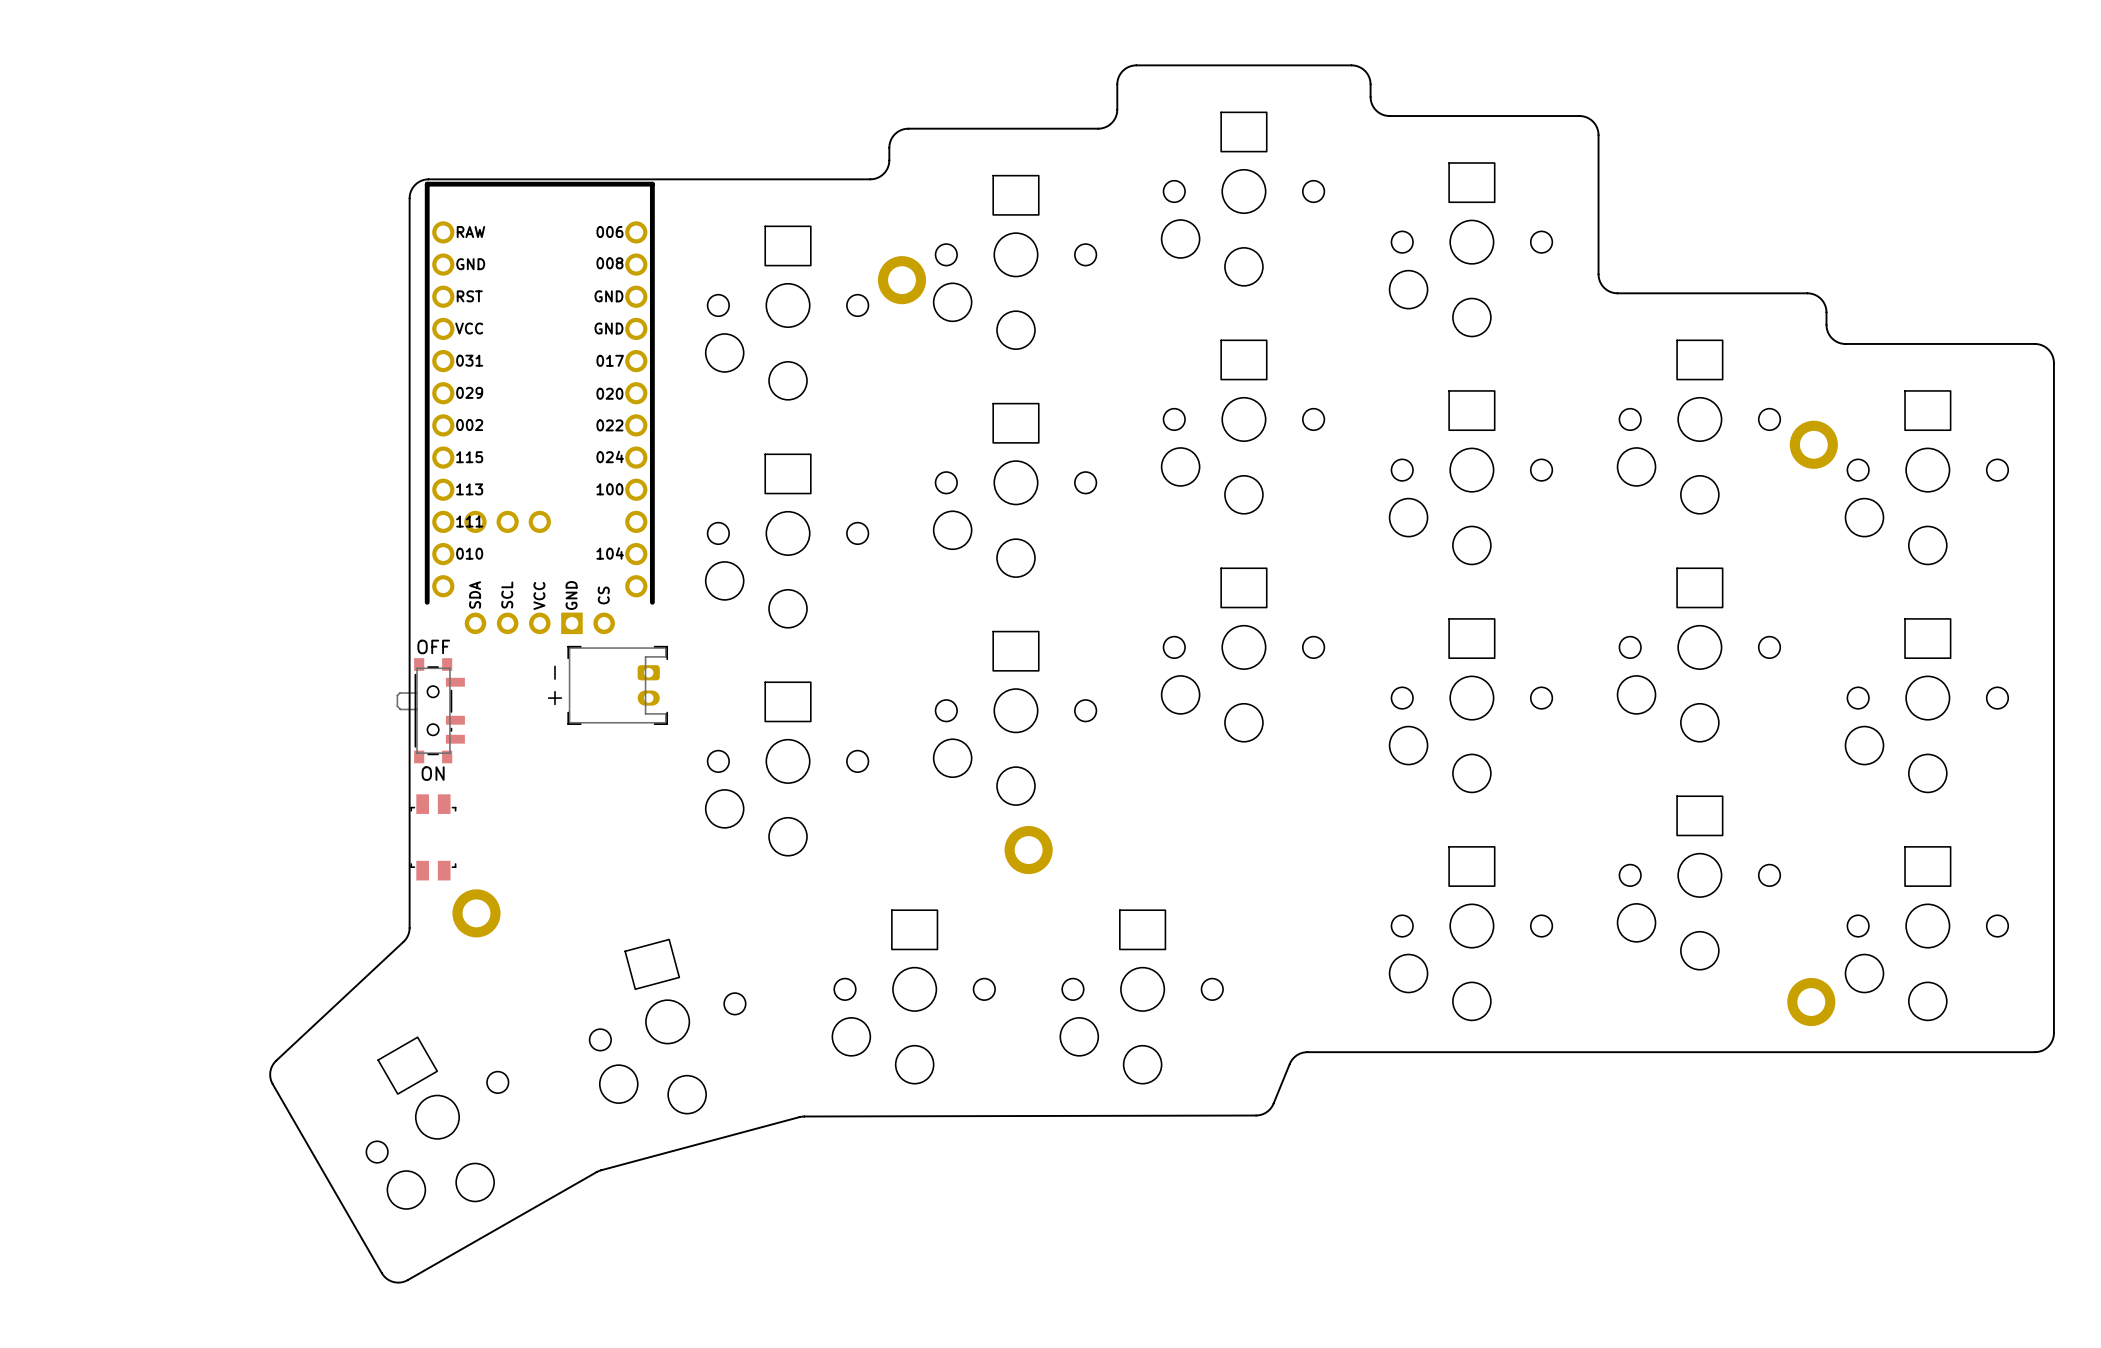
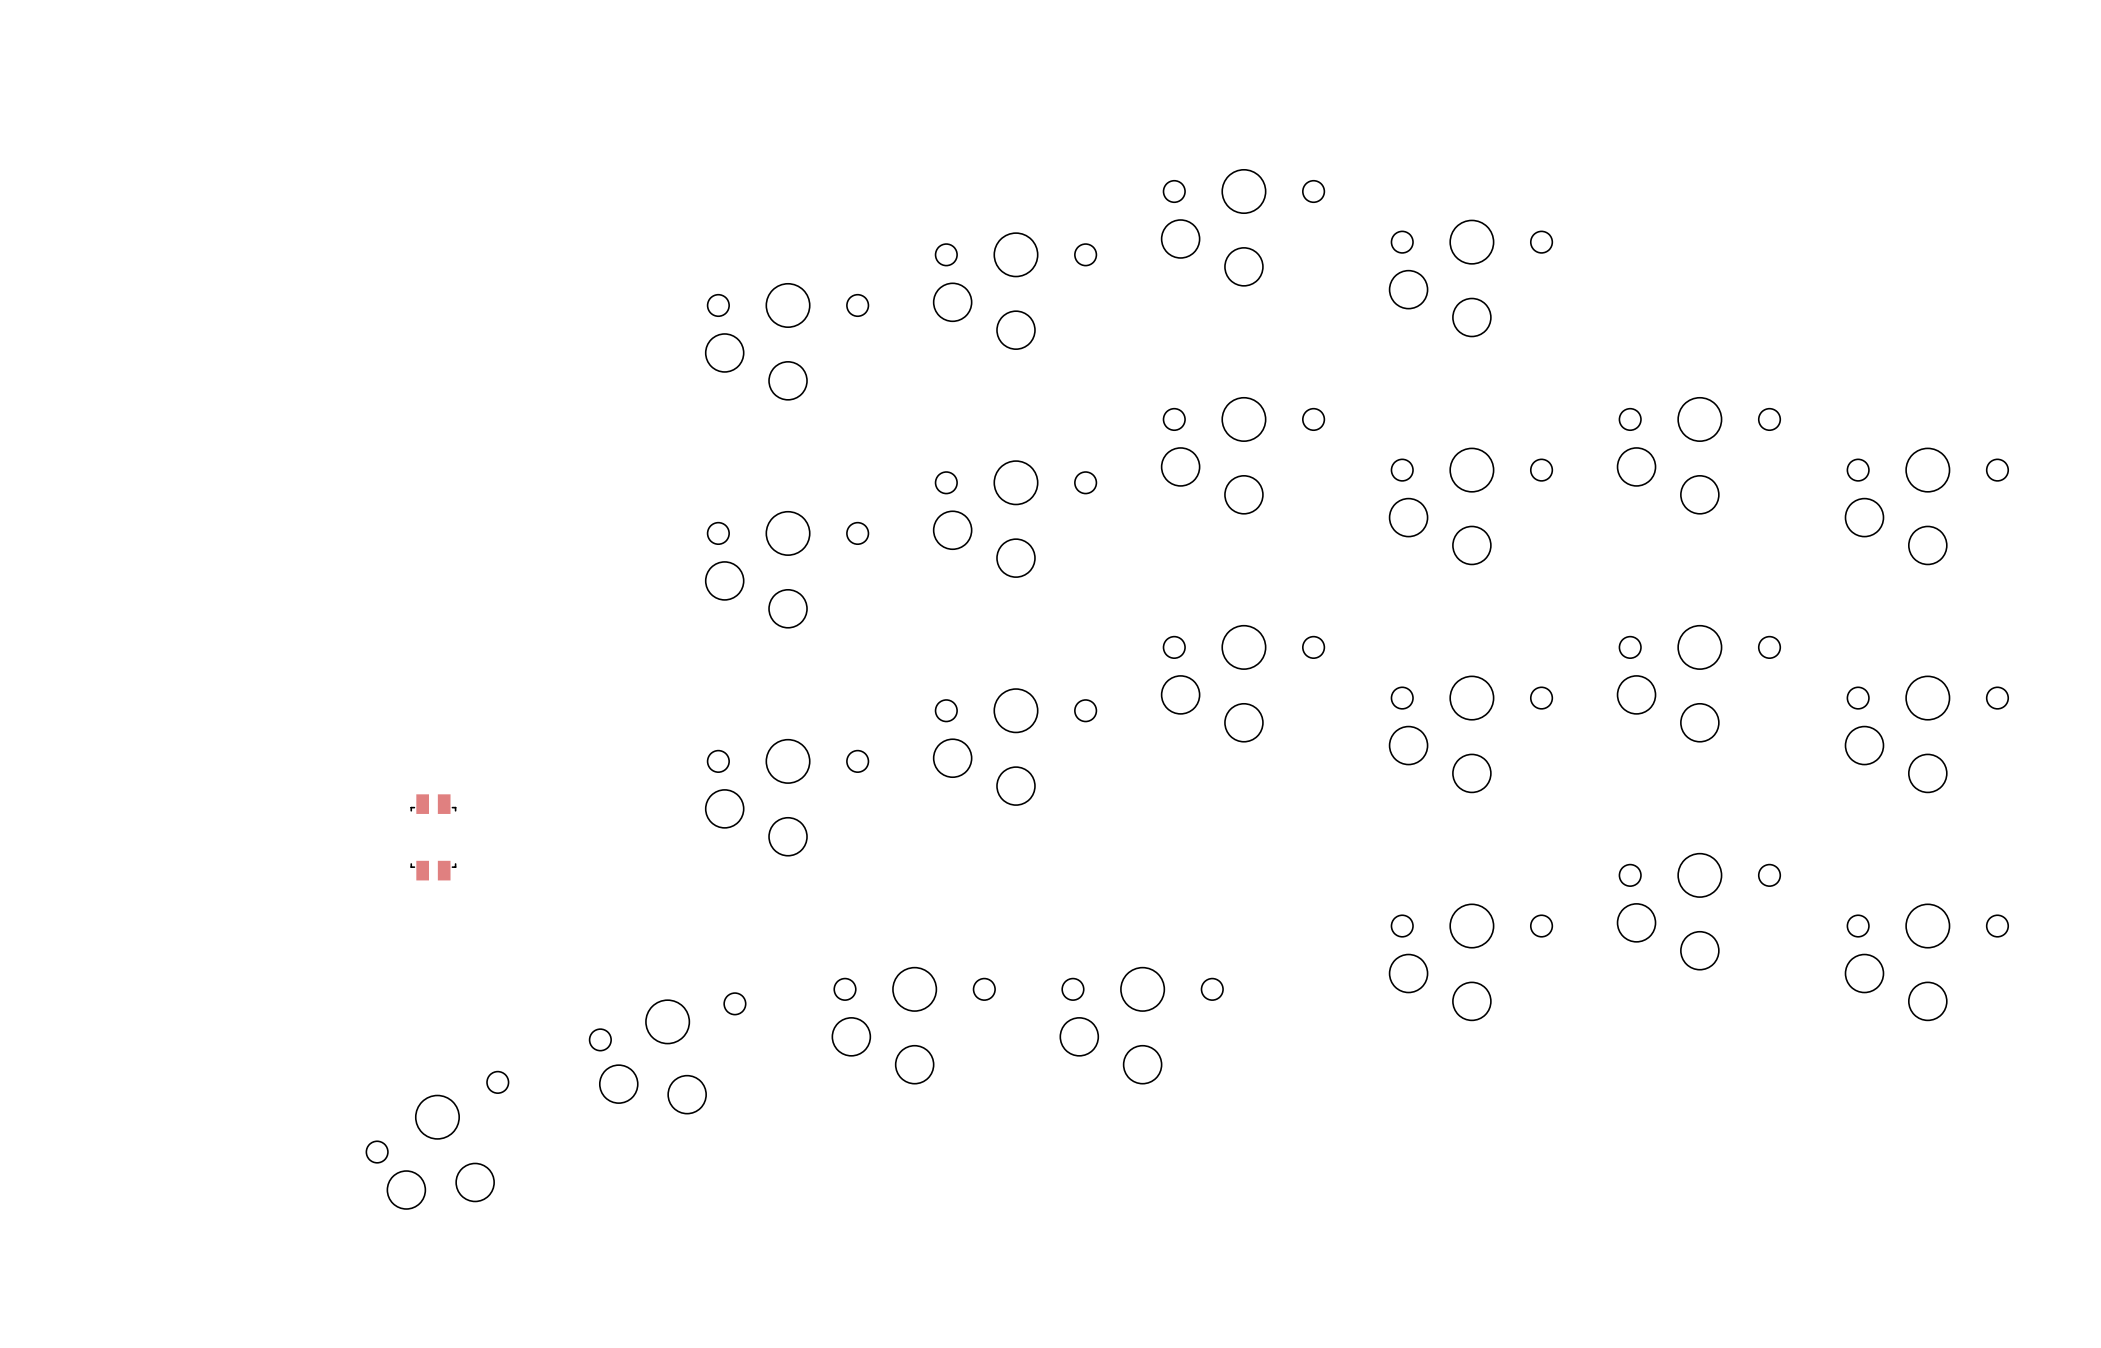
board edge: (1136, 65) (1354, 65) (1363, 69) (1368, 74) (1372, 104) (1378, 112) (1384, 115) (1584, 116) (1592, 121) (1598, 132) (1598, 274) (1601, 283) (1608, 290) (1617, 293) (1809, 293) (1819, 297) (1823, 302) (1827, 332) (1832, 338) (1840, 343) (2034, 343) (2048, 349) (2053, 362) (2053, 1033) (2051, 1042) (2044, 1049) (2034, 1052) (1307, 1052) (1298, 1054) (1291, 1060) (1272, 1105) (1266, 1112) (1258, 1115) (801, 1116) (598, 1171) (407, 1280) (398, 1282) (388, 1280) (381, 1273) (272, 1084) (270, 1073) (276, 1060) (403, 941) (409, 931) (409, 198) (412, 188) (419, 181) (428, 179) (872, 179) (881, 175) (886, 169) (890, 140) (896, 132) (903, 129) (1105, 127) (1111, 123) (1116, 114) (1117, 81) (1119, 74) (1126, 67) (1136, 65) -> none
part: (1243, 131) -> none
part: (1471, 182) -> none
part: (1015, 195) -> none
part: (788, 245) -> none
part: (902, 280) -> none
part: (1243, 359) -> none
part: (1699, 359) -> none
part: (539, 393) -> none
part: (1471, 410) -> none
part: (1927, 410) -> none
part: (1015, 423) -> none
part: (1813, 444) -> none
part: (788, 473) -> none
part: (1243, 587) -> none
part: (1699, 587) -> none
part: (539, 623) -> none
part: (1471, 638) -> none
part: (1927, 638) -> none
part: (1015, 651) -> none
part: (608, 685) -> none
part: (788, 701) -> none
part: (430, 710) -> none
part: (1699, 815) -> none
part: (1028, 850) -> none
part: (1471, 866) -> none
part: (1927, 866) -> none
part: (476, 913) -> none
part: (914, 929) -> none
part: (1142, 929) -> none
part: (652, 964) -> none
part: (1811, 1002) -> none
part: (407, 1065) -> none

